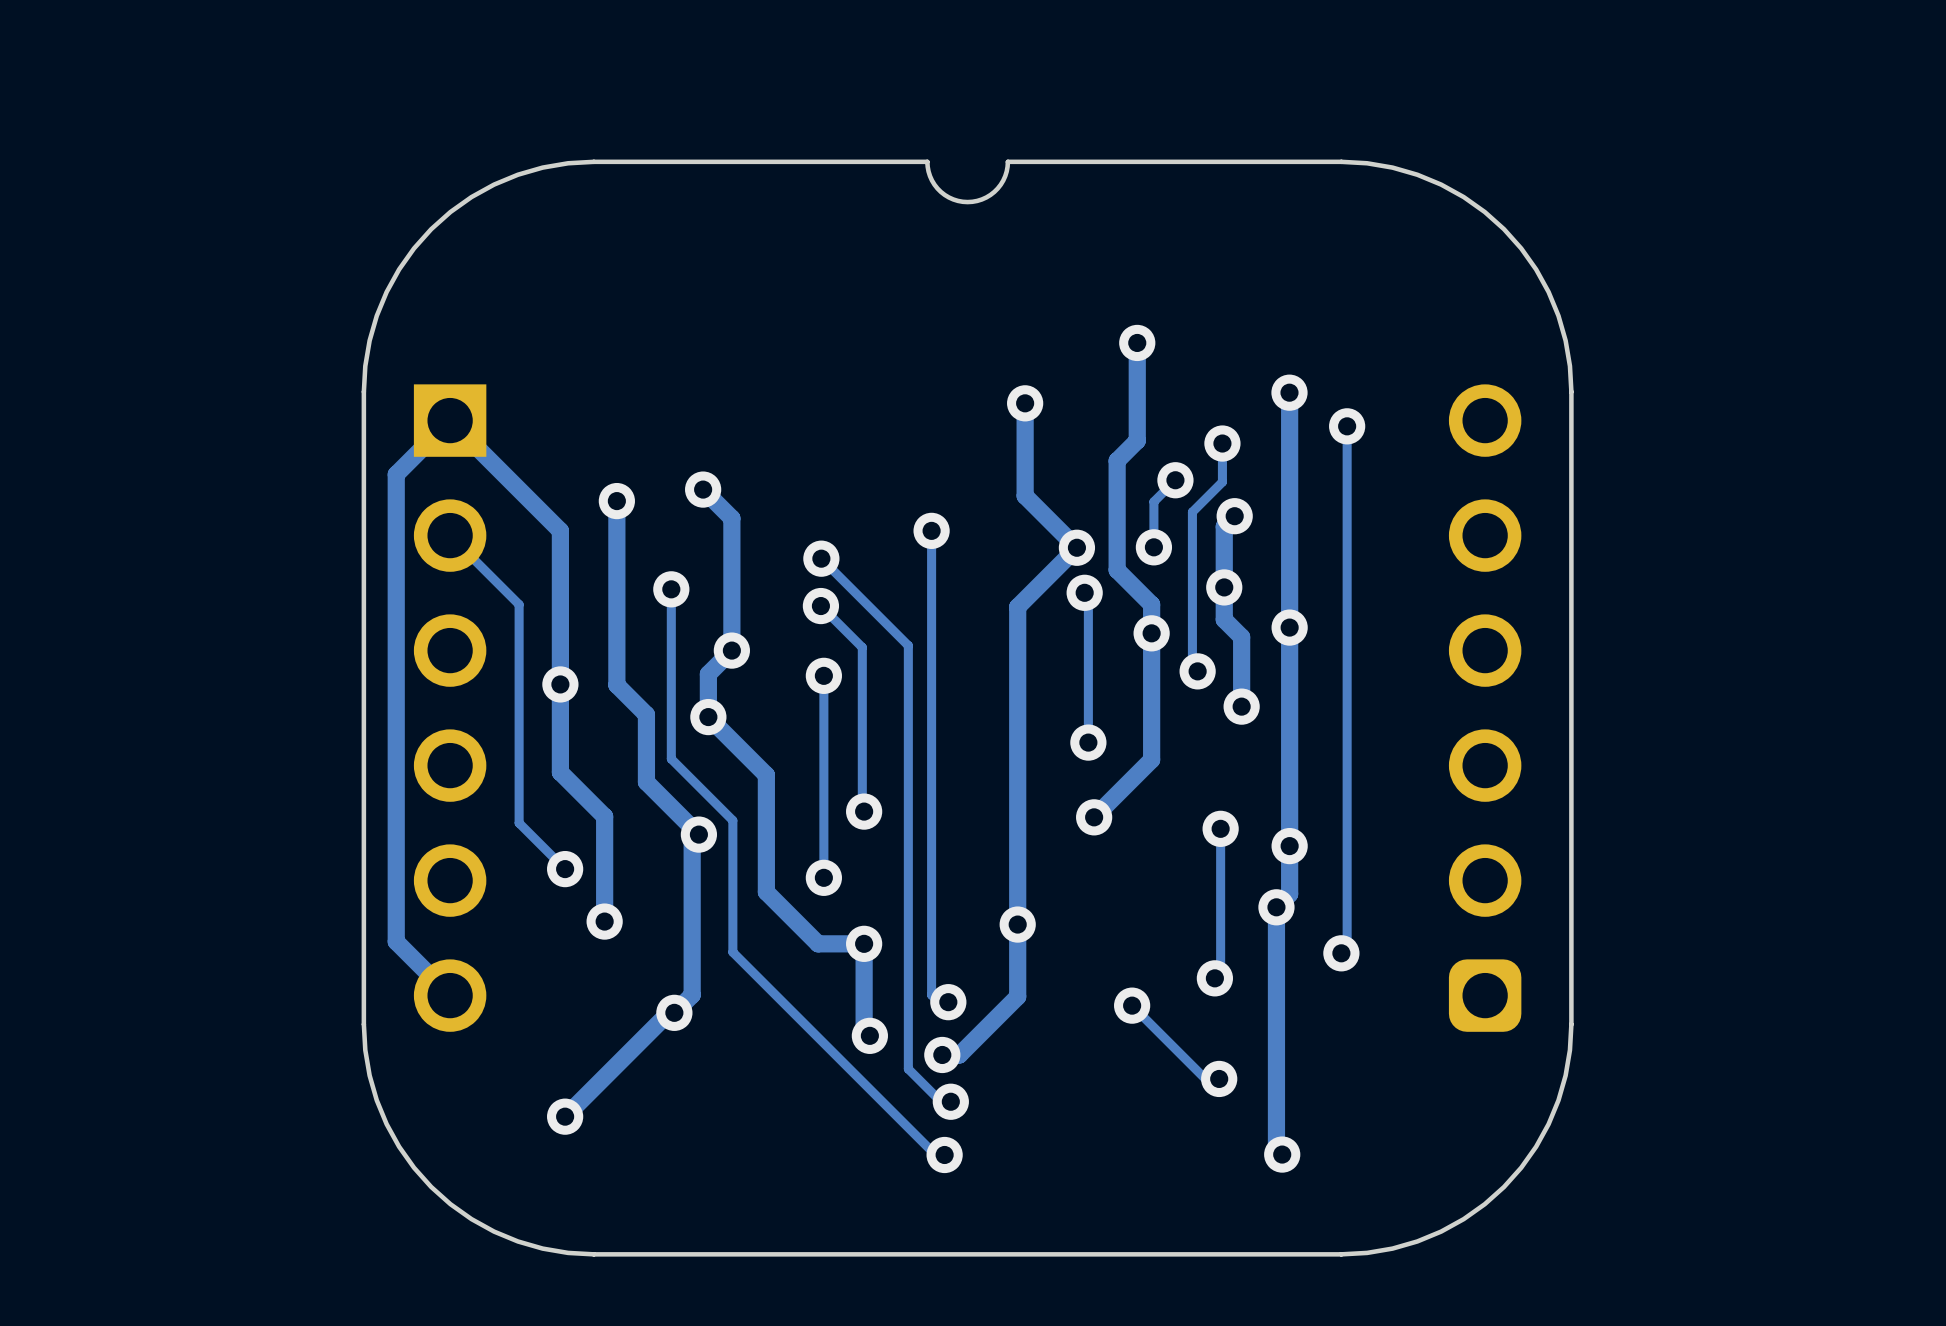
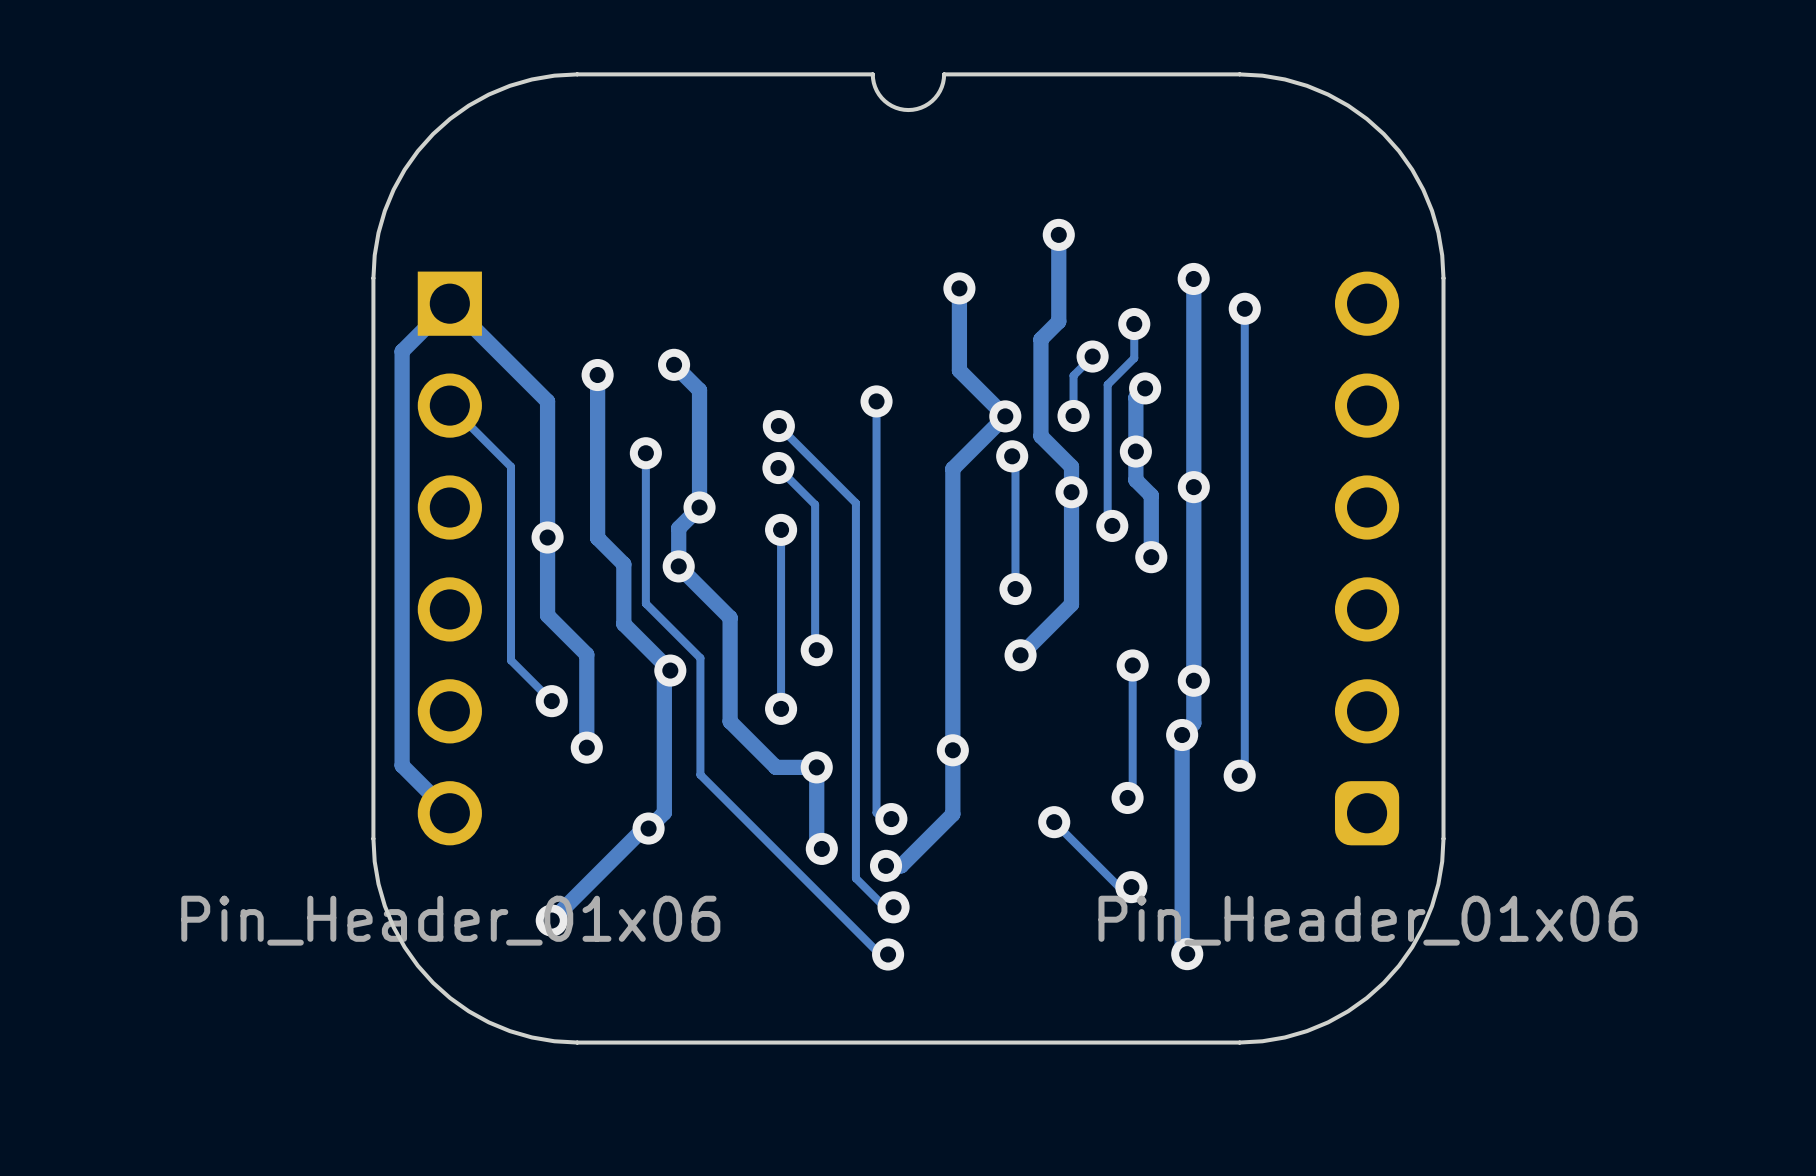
drawing: none -> [181, 895, 721, 946]
drawing: none -> [1098, 895, 1638, 946]

